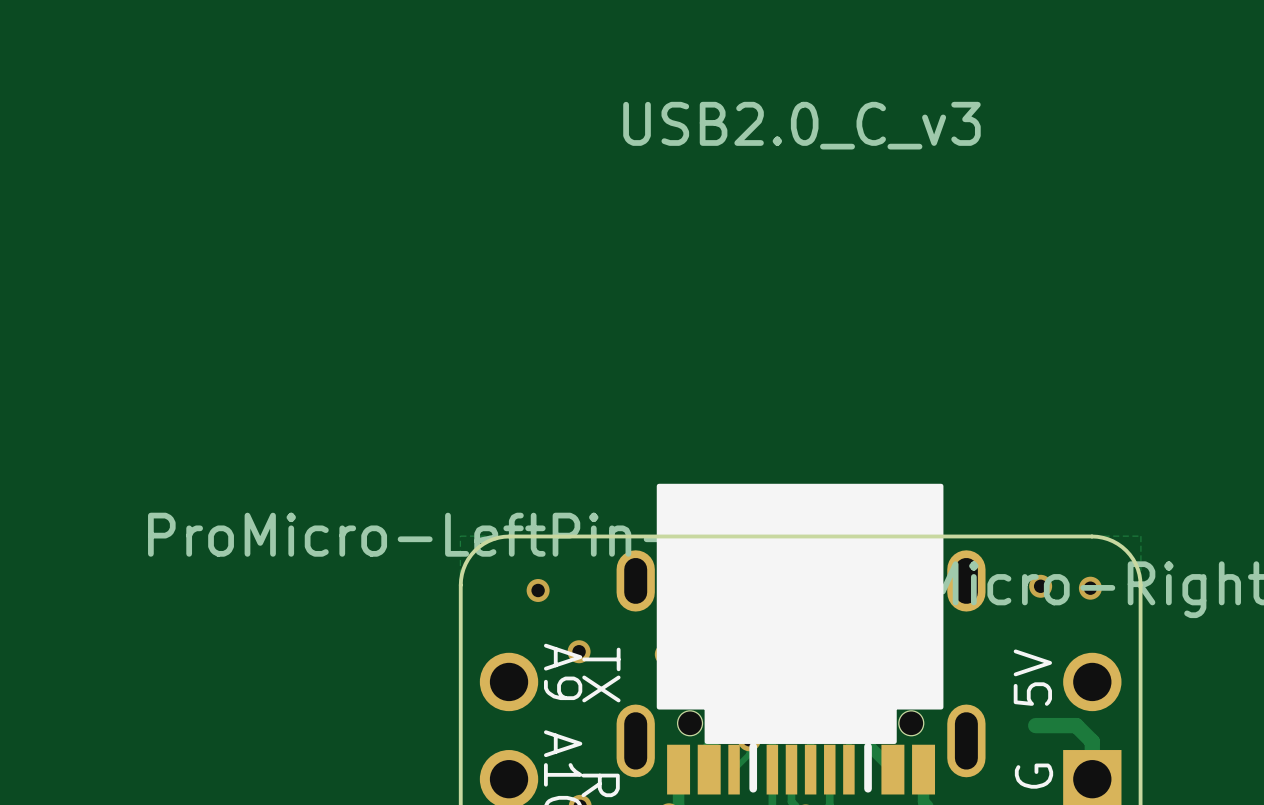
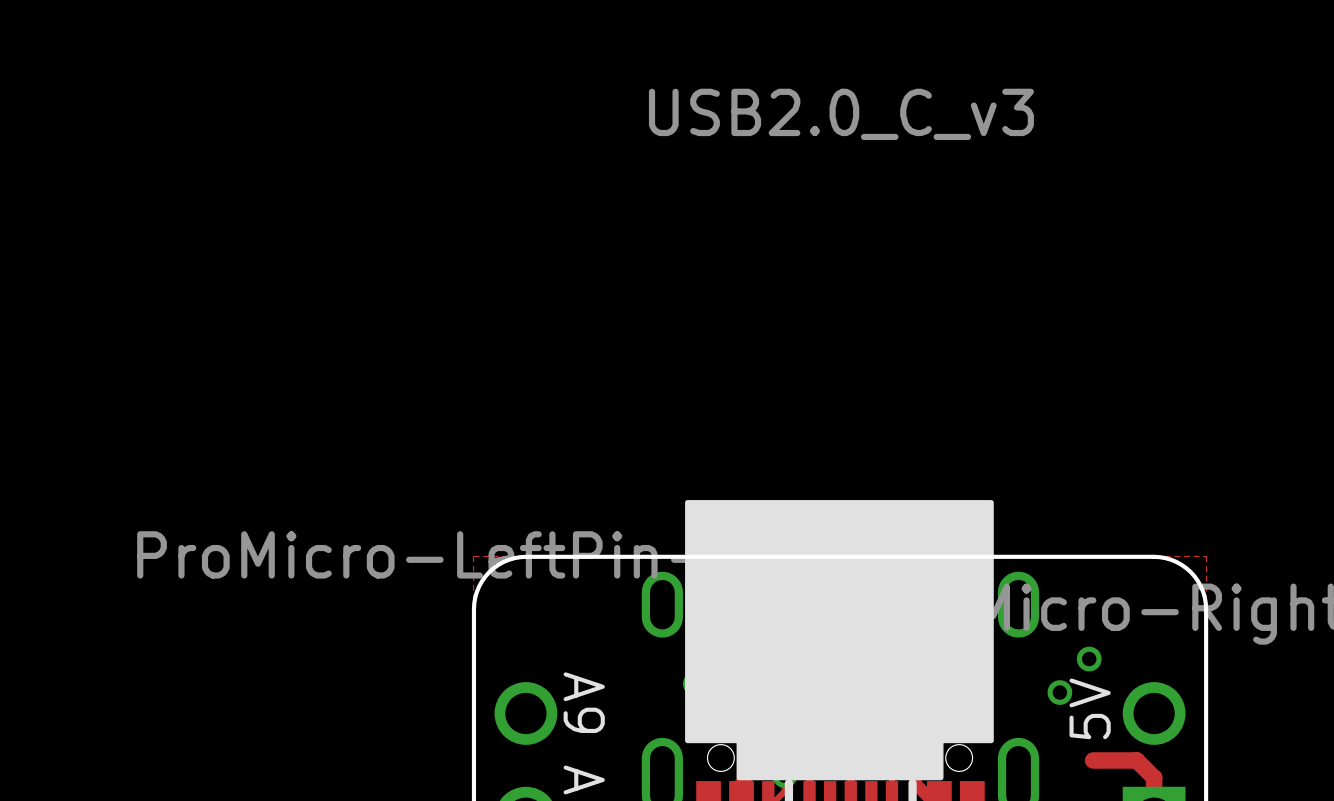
via: (1040, 586) -> none
via: (1090, 588) -> none
via: (538, 590) -> none
via: none -> (1089, 659)
via: (579, 651) -> none
via: none -> (1059, 692)
text: TX (601, 675) -> none

